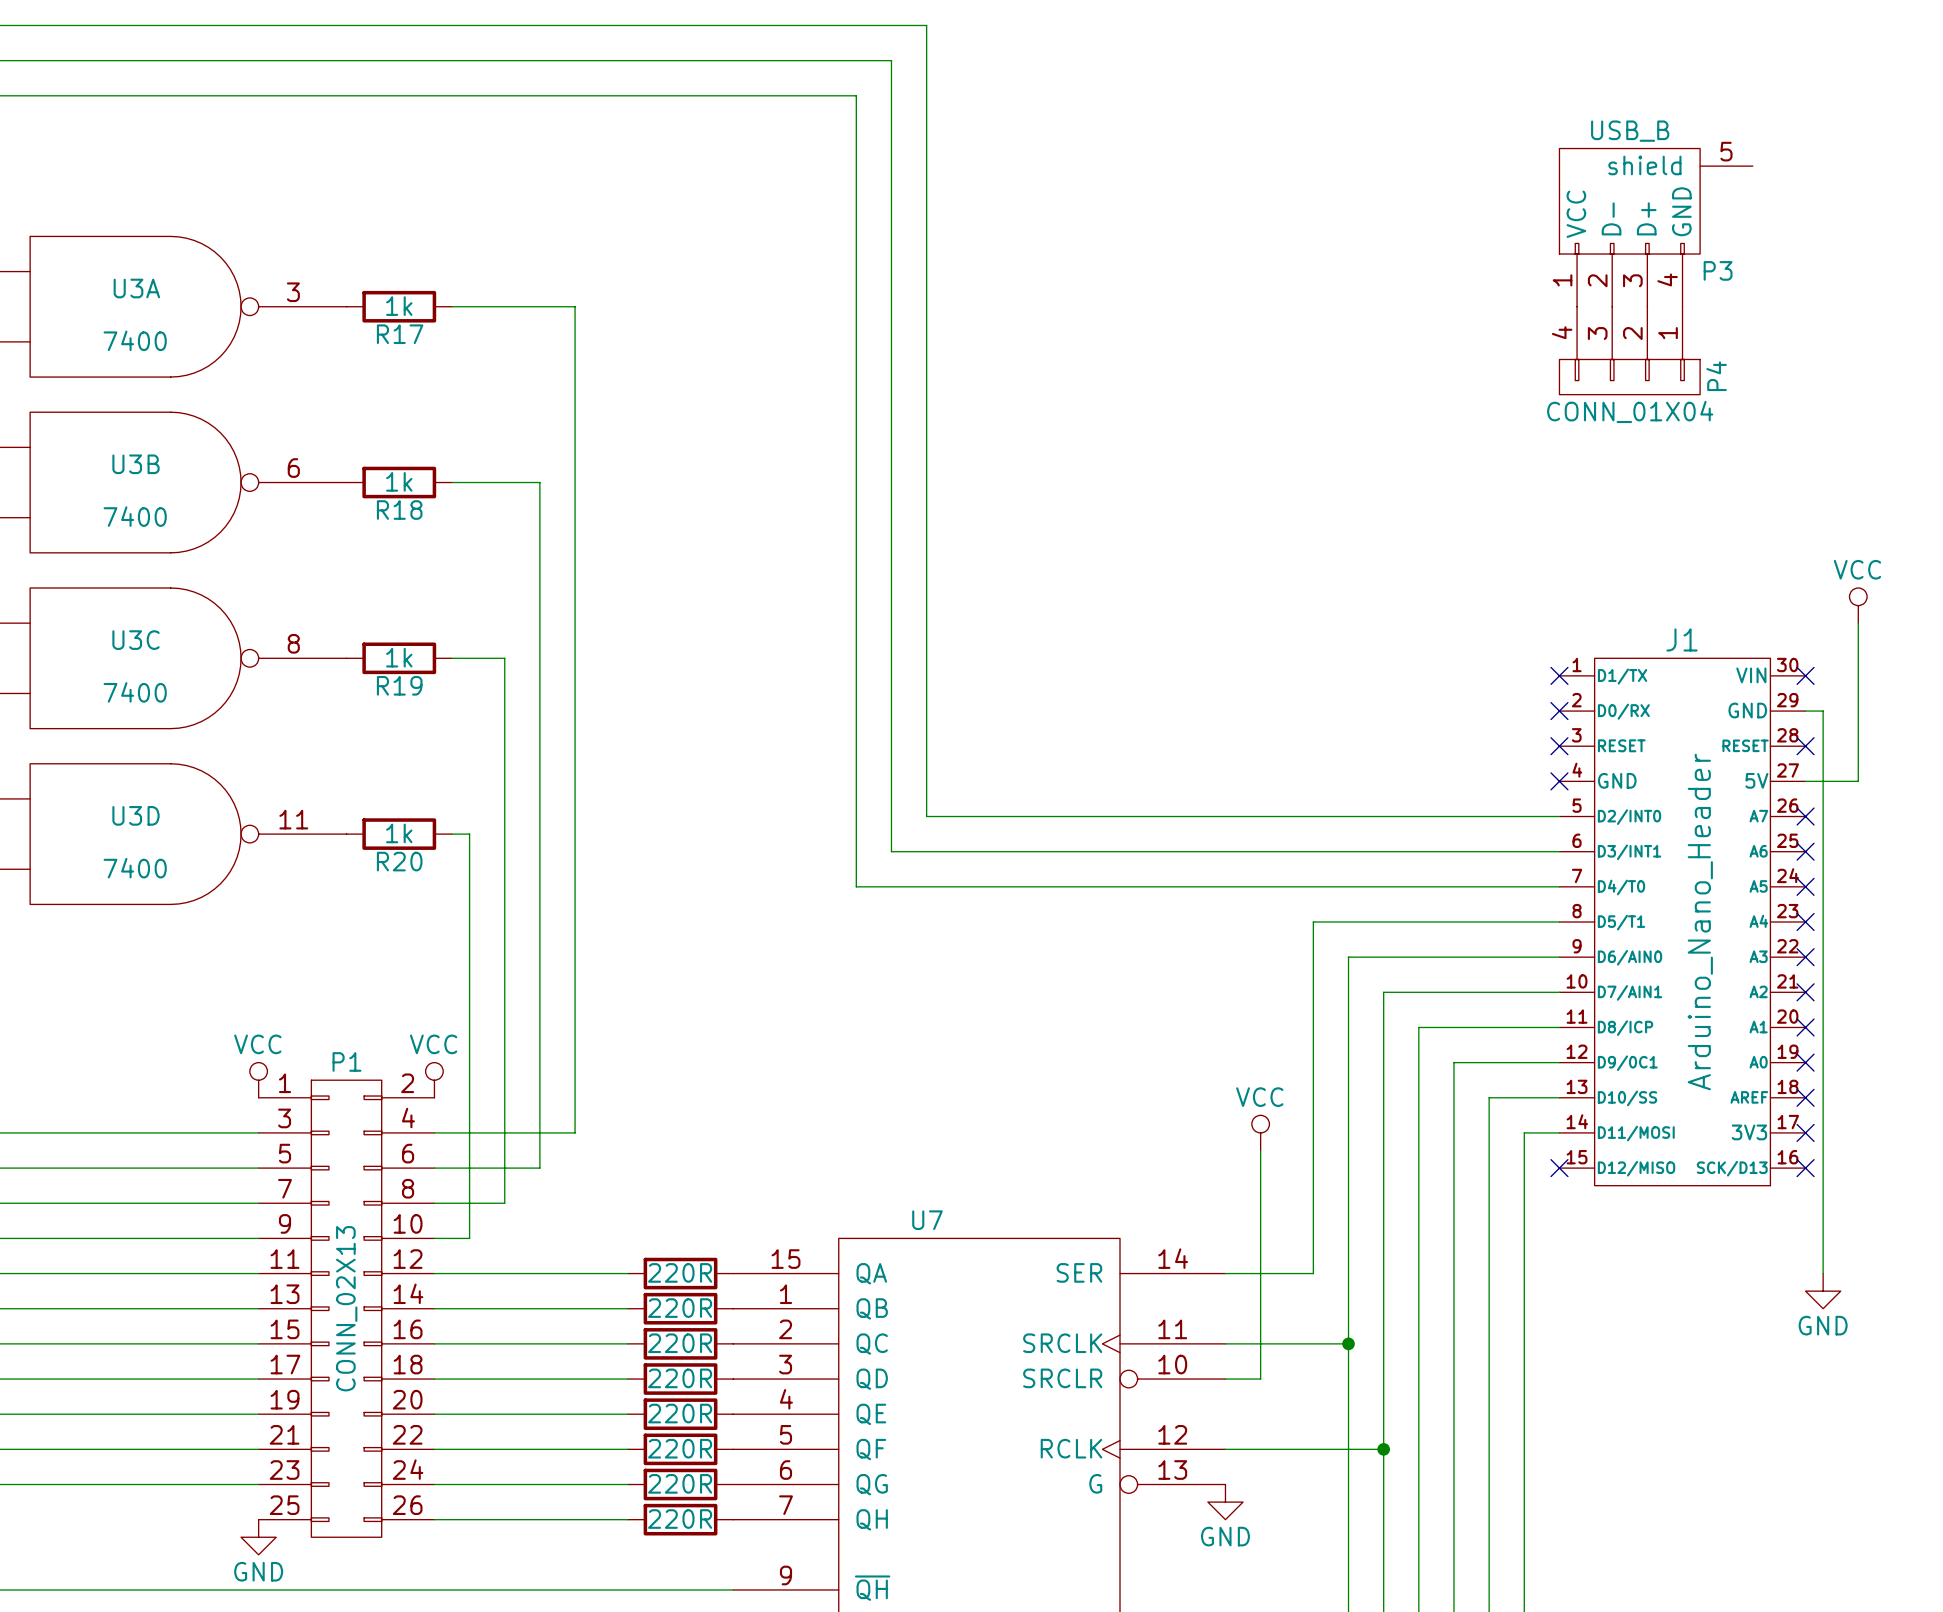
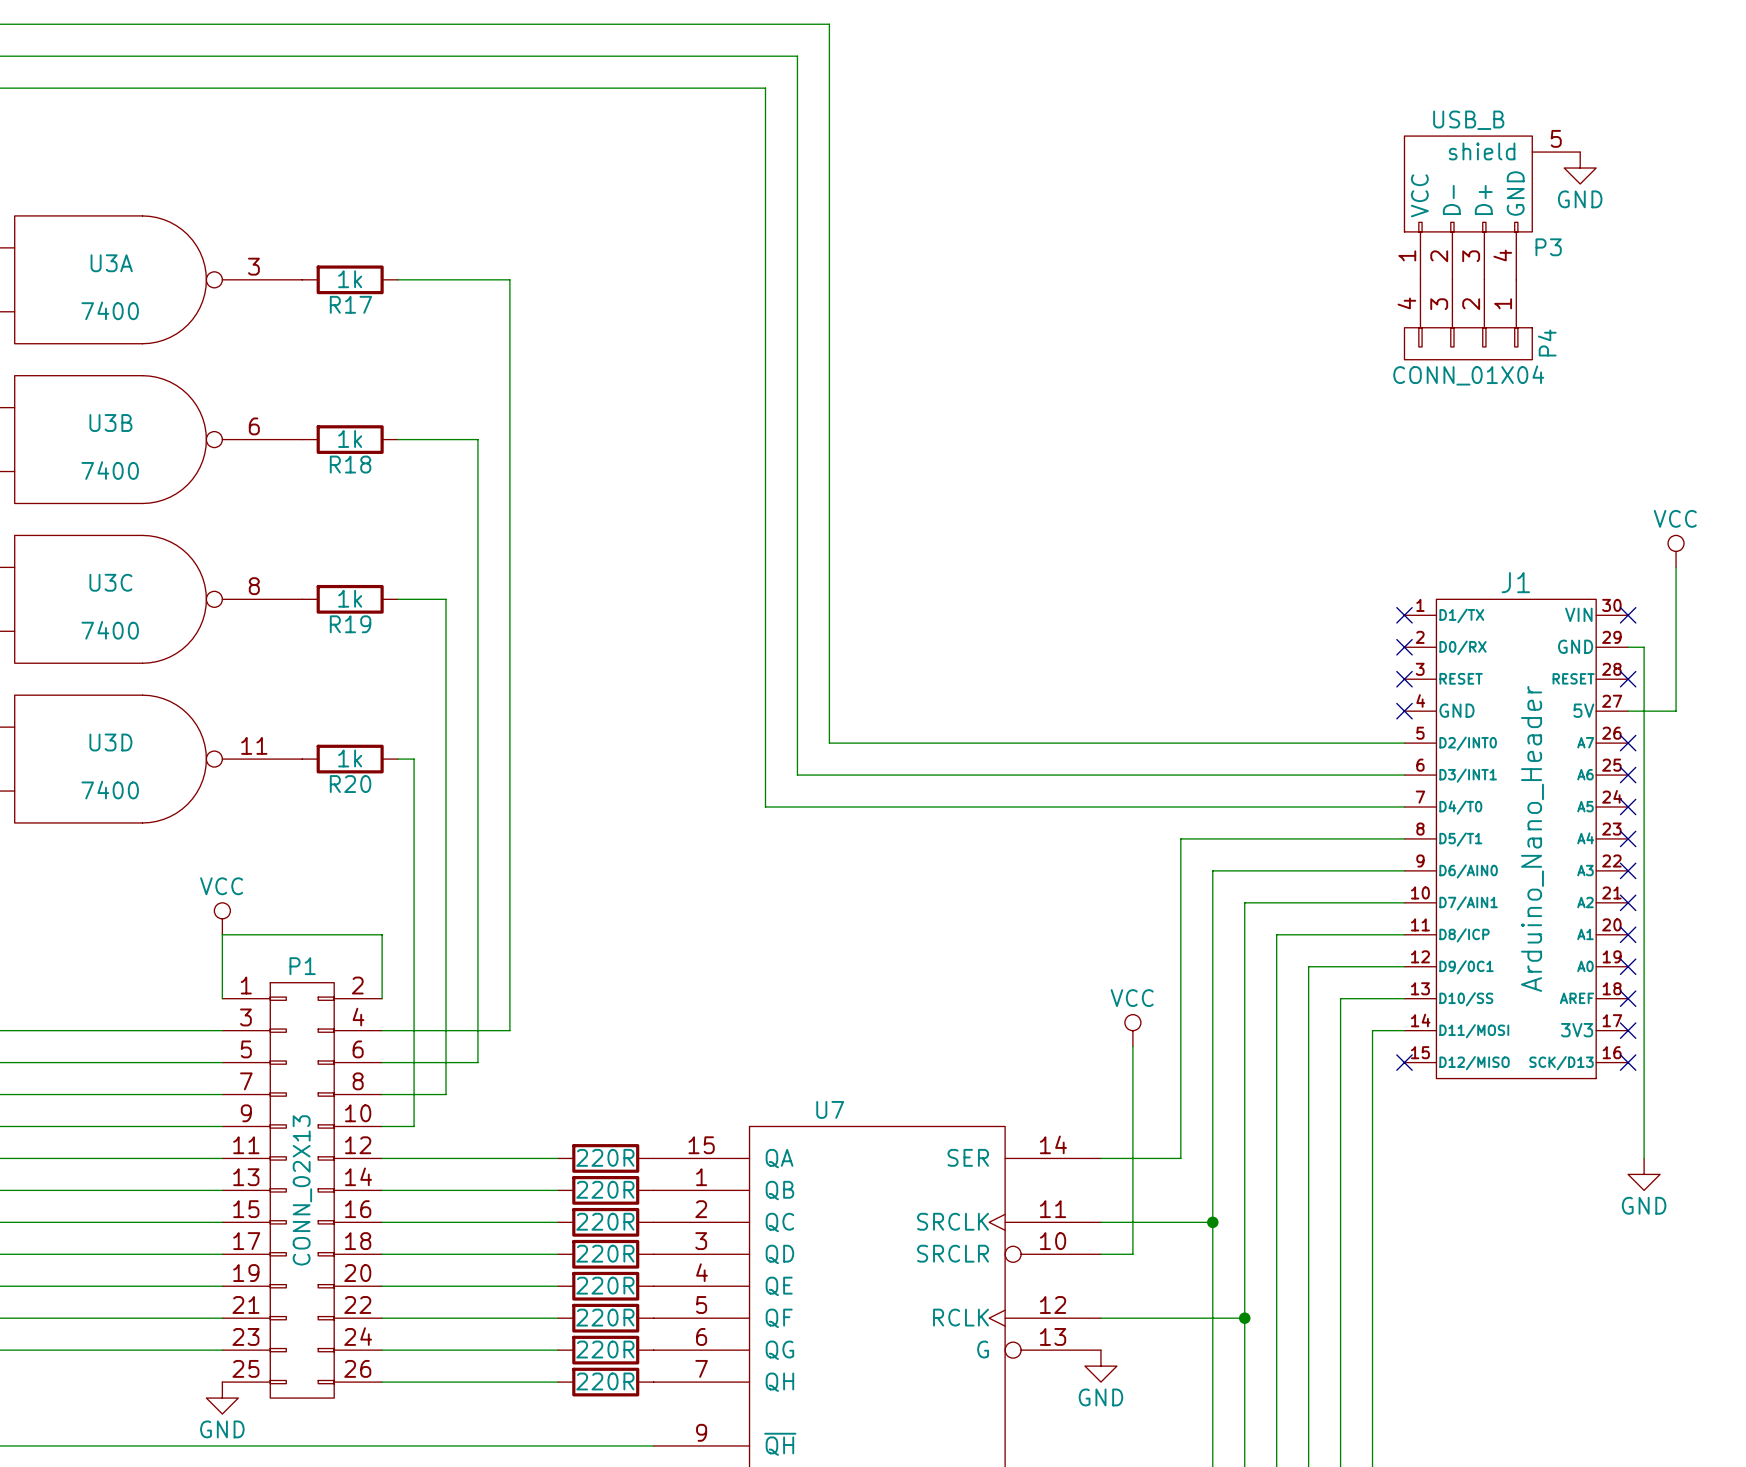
power symbol: none -> GND (1580, 168)
power symbol position: VCC (258, 1080) -> VCC (222, 918)
power symbol: VCC (434, 1080) -> none
wire: none -> (222, 998) (222, 934) (382, 934) (382, 998)

